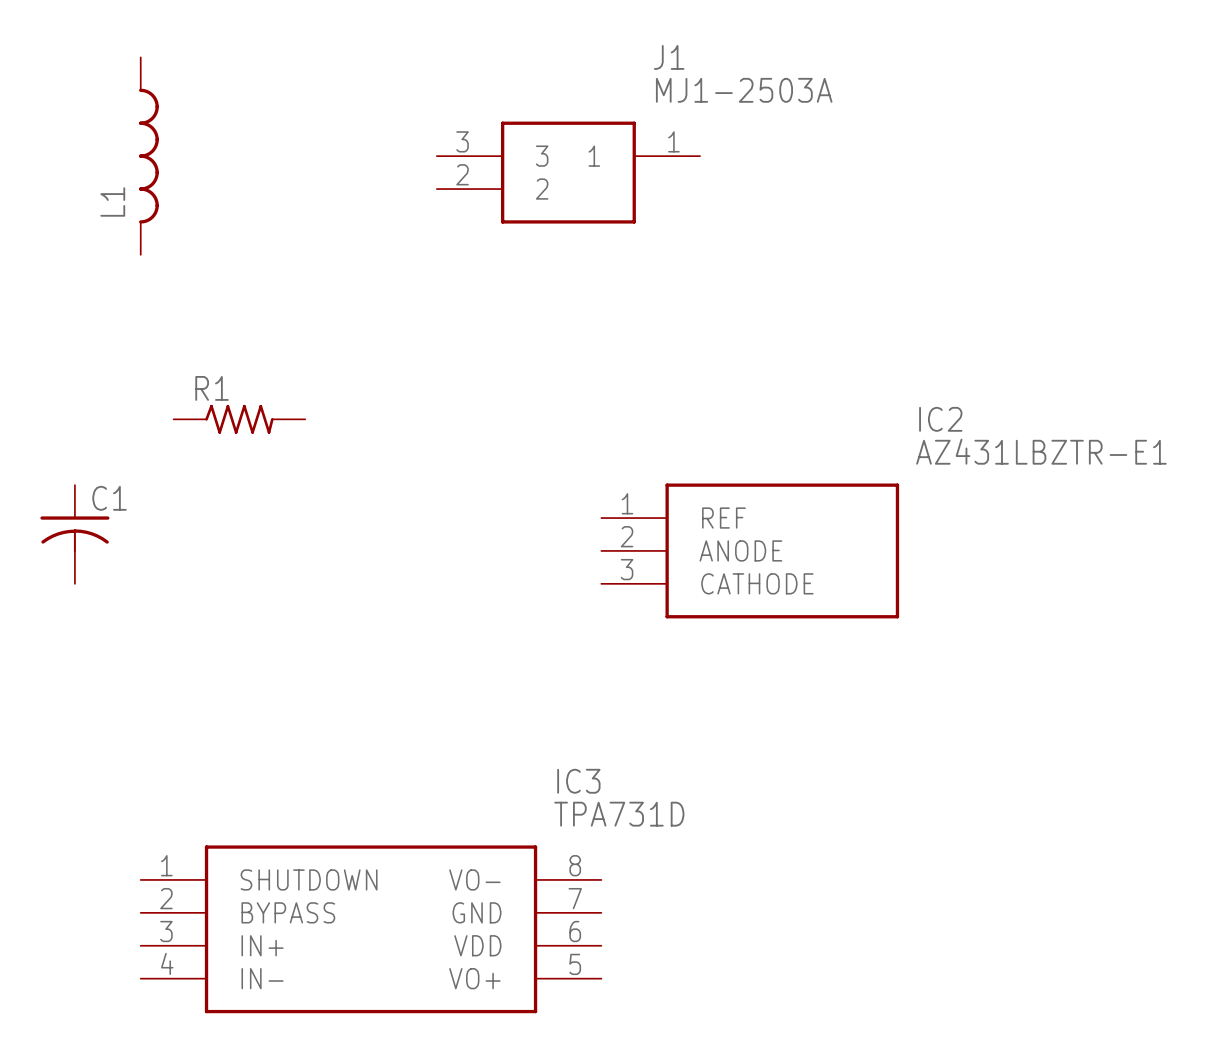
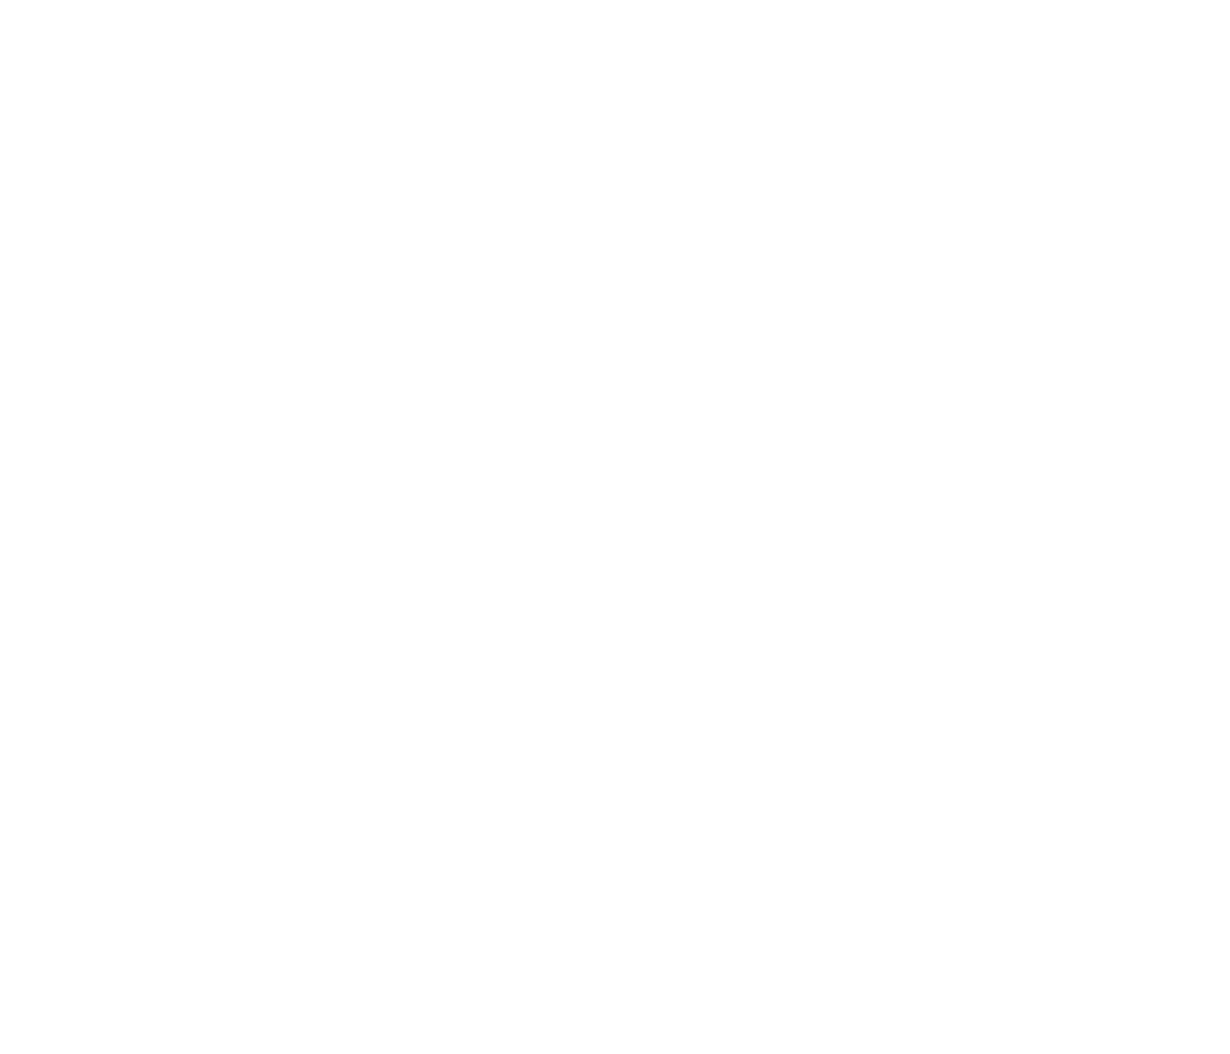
L1: (148, 156) -> none
J1: MJ1-2503A (568, 172) -> none
R1: (239, 419) -> none
C1: (74, 534) -> none
IC2: AZ431LBZTR-E1 (750, 550) -> none
IC3: TPA731D (371, 929) -> none

